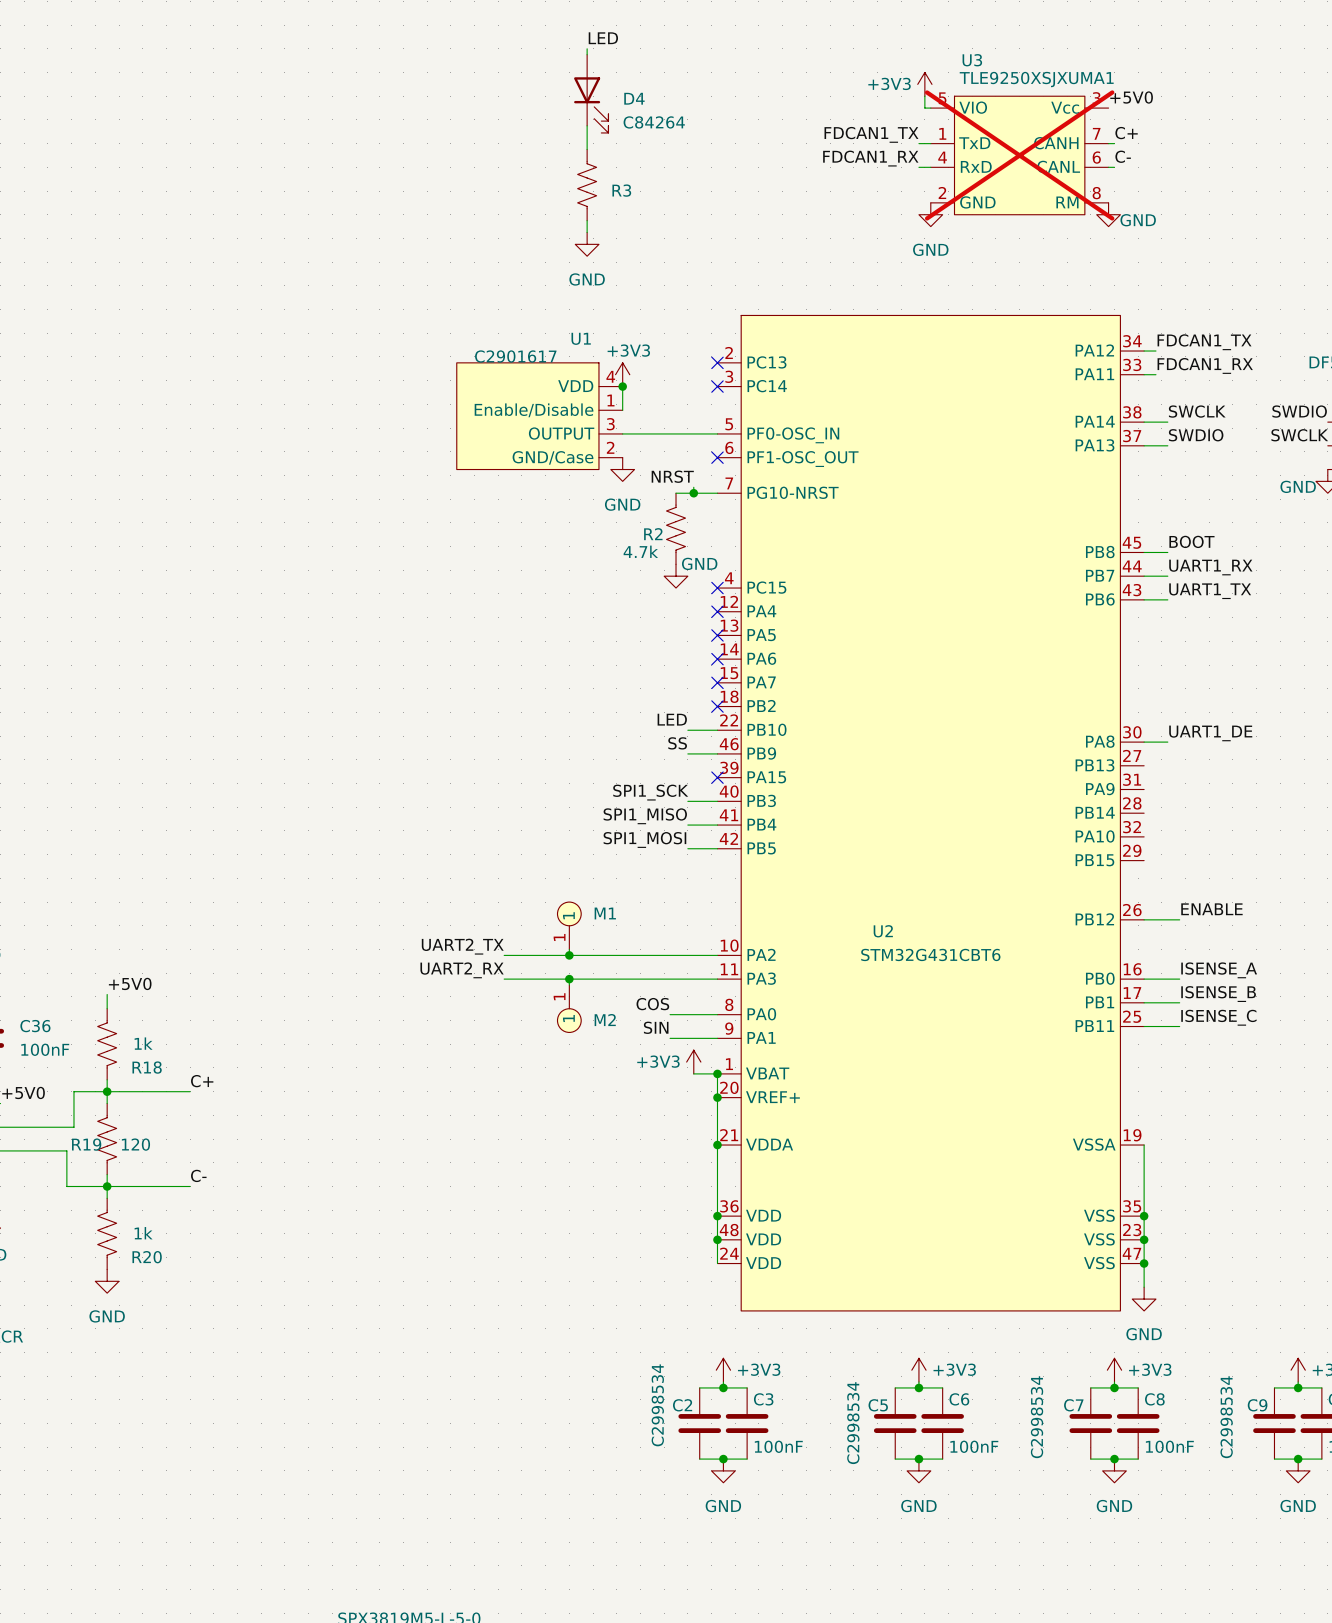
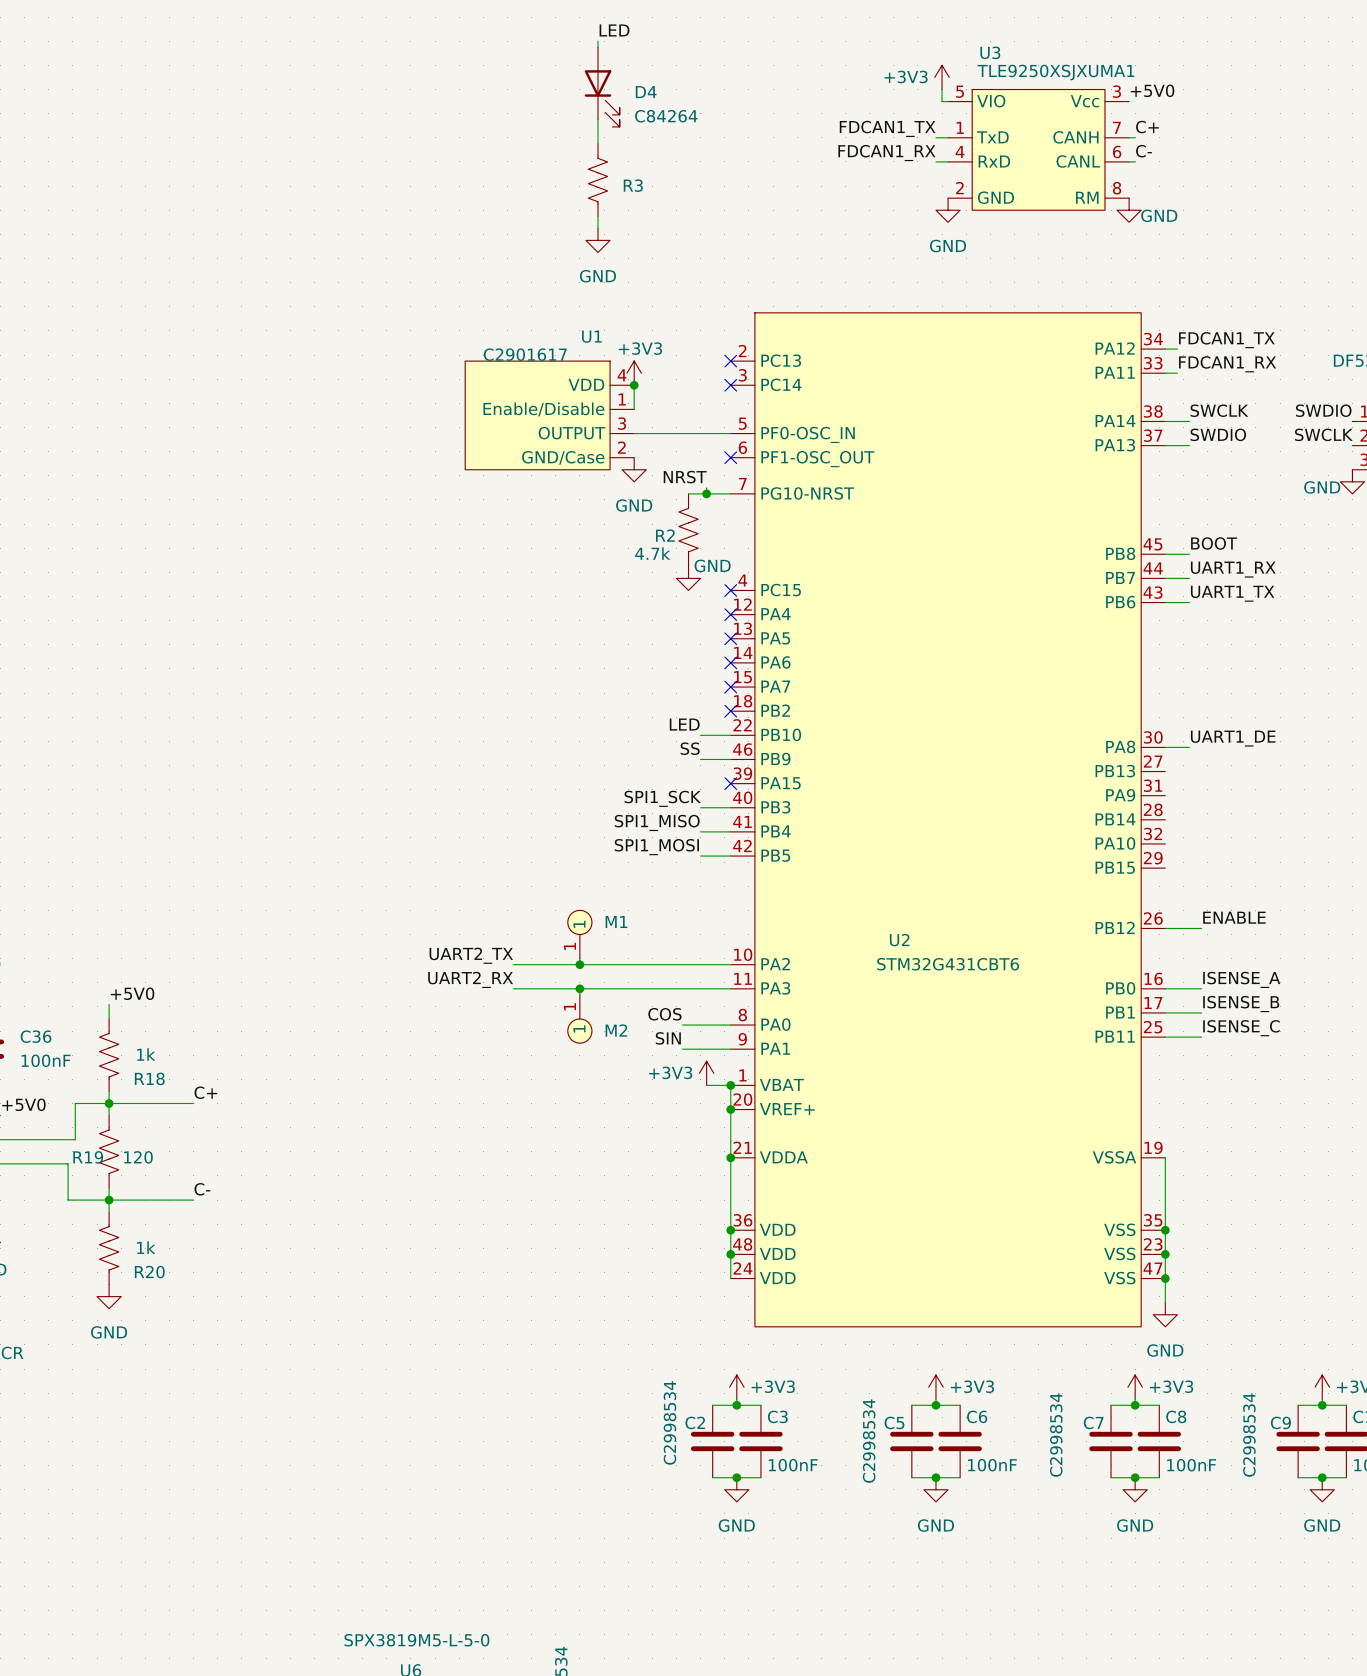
U3 do-not-place cross: (1019, 155) -> none

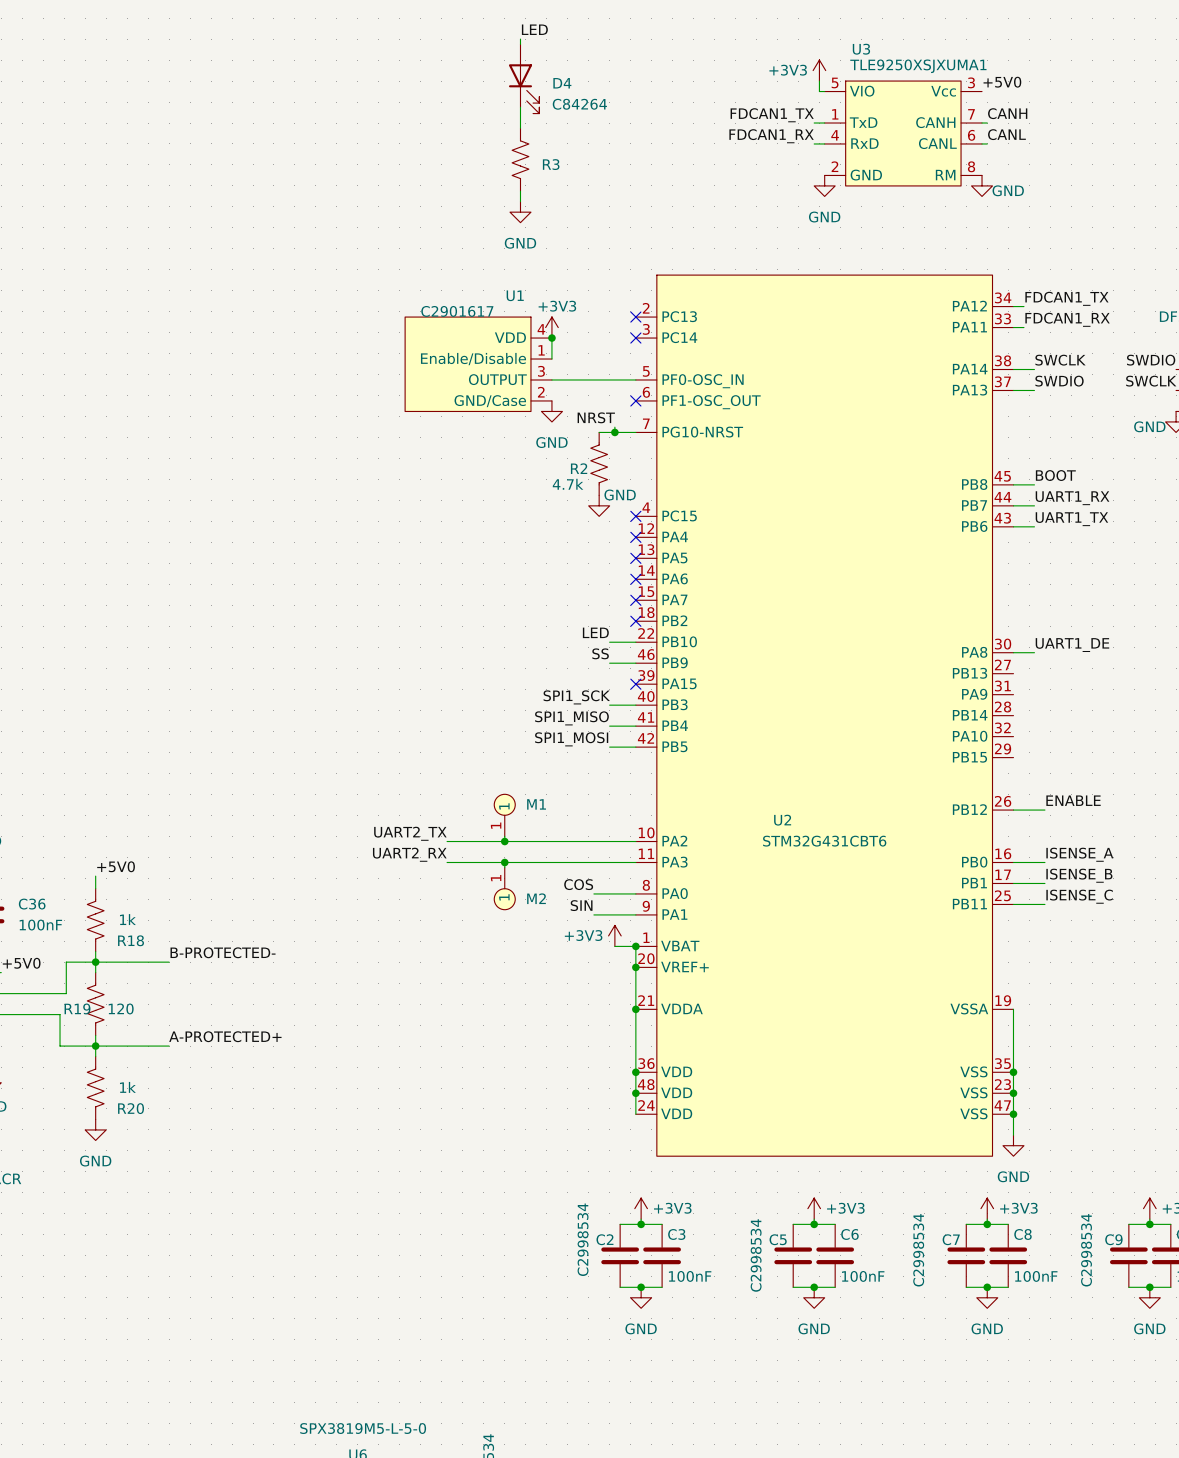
label: C+ (1147, 127) -> CANH (1007, 113)
label: C- (1143, 151) -> CANL (1006, 134)
label: C+ (205, 1092) -> B-PROTECTED- (223, 952)
label: C- (202, 1189) -> A-PROTECTED+ (225, 1036)

